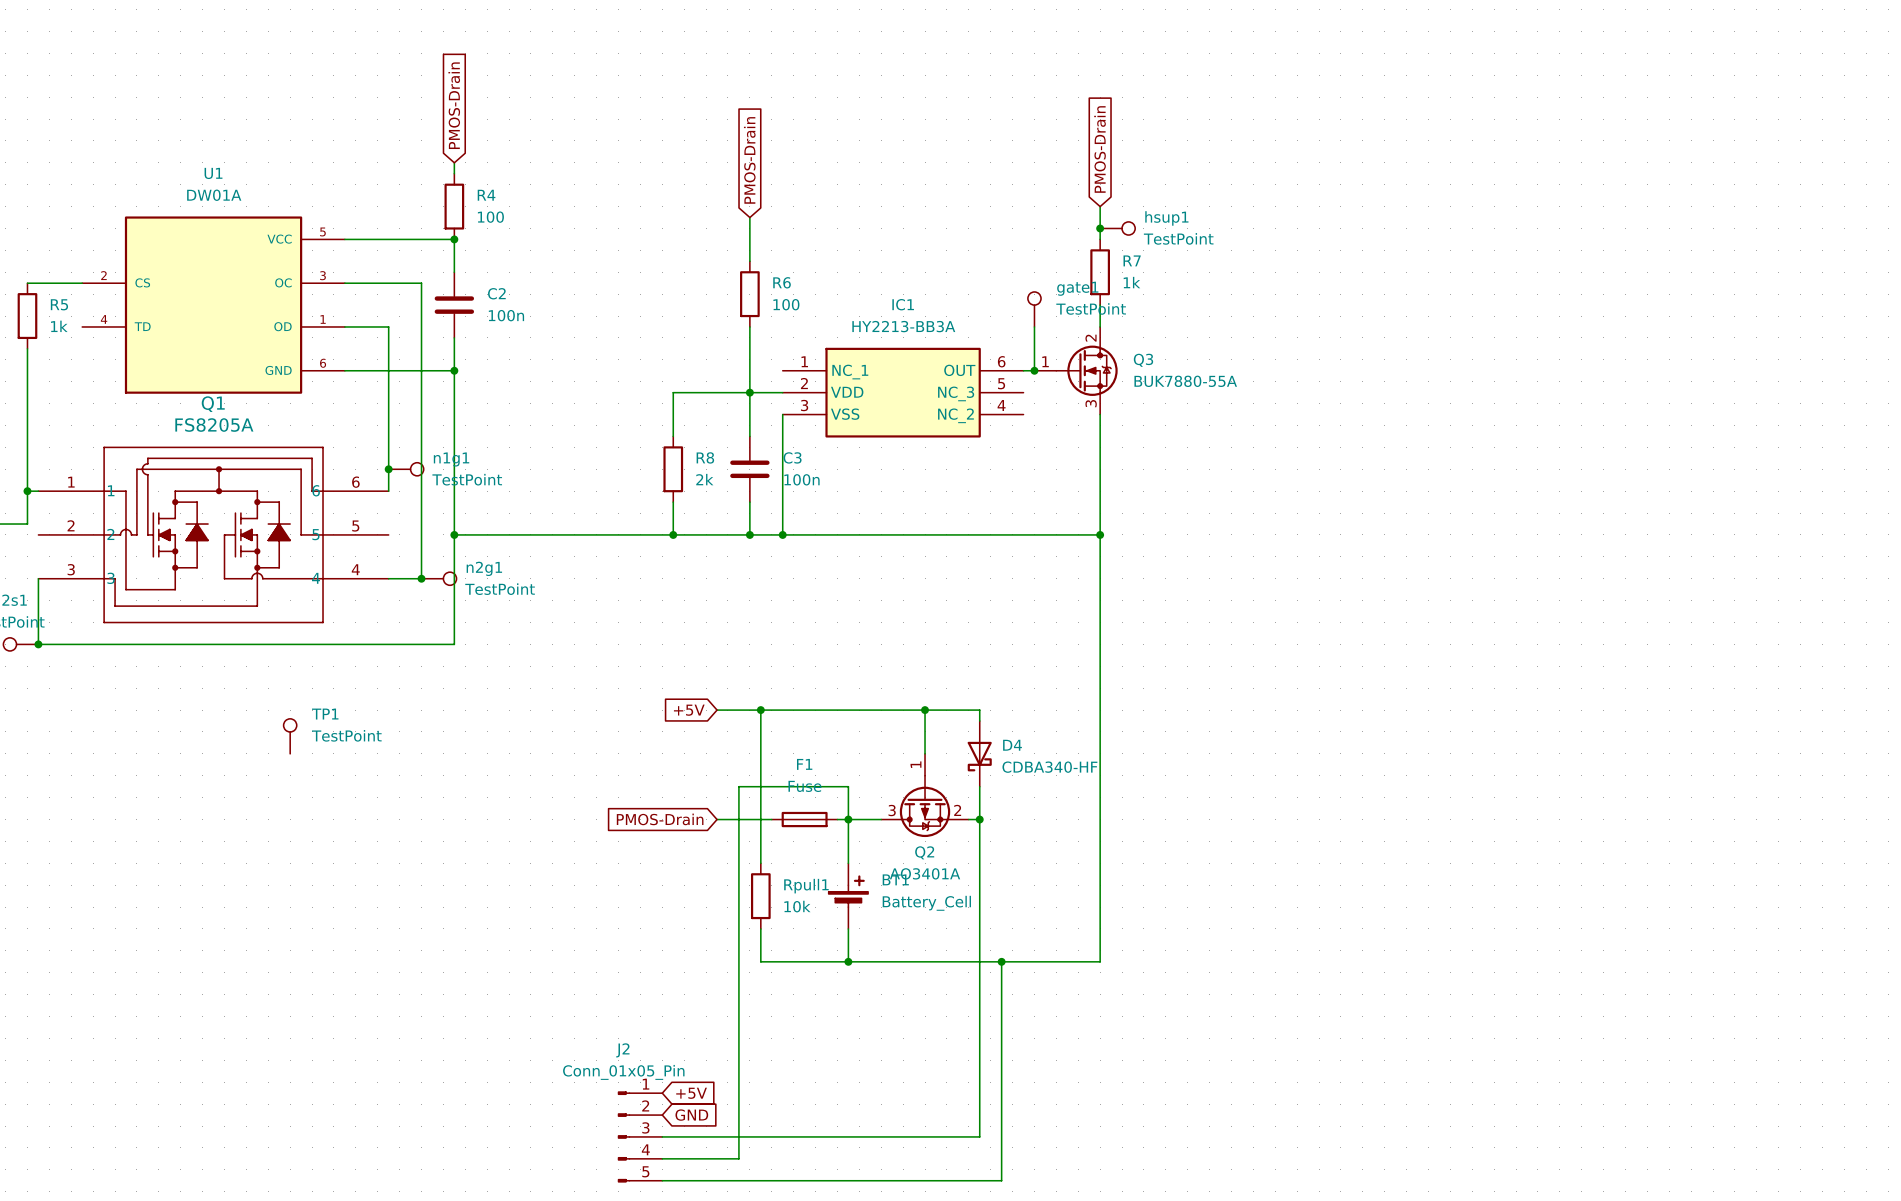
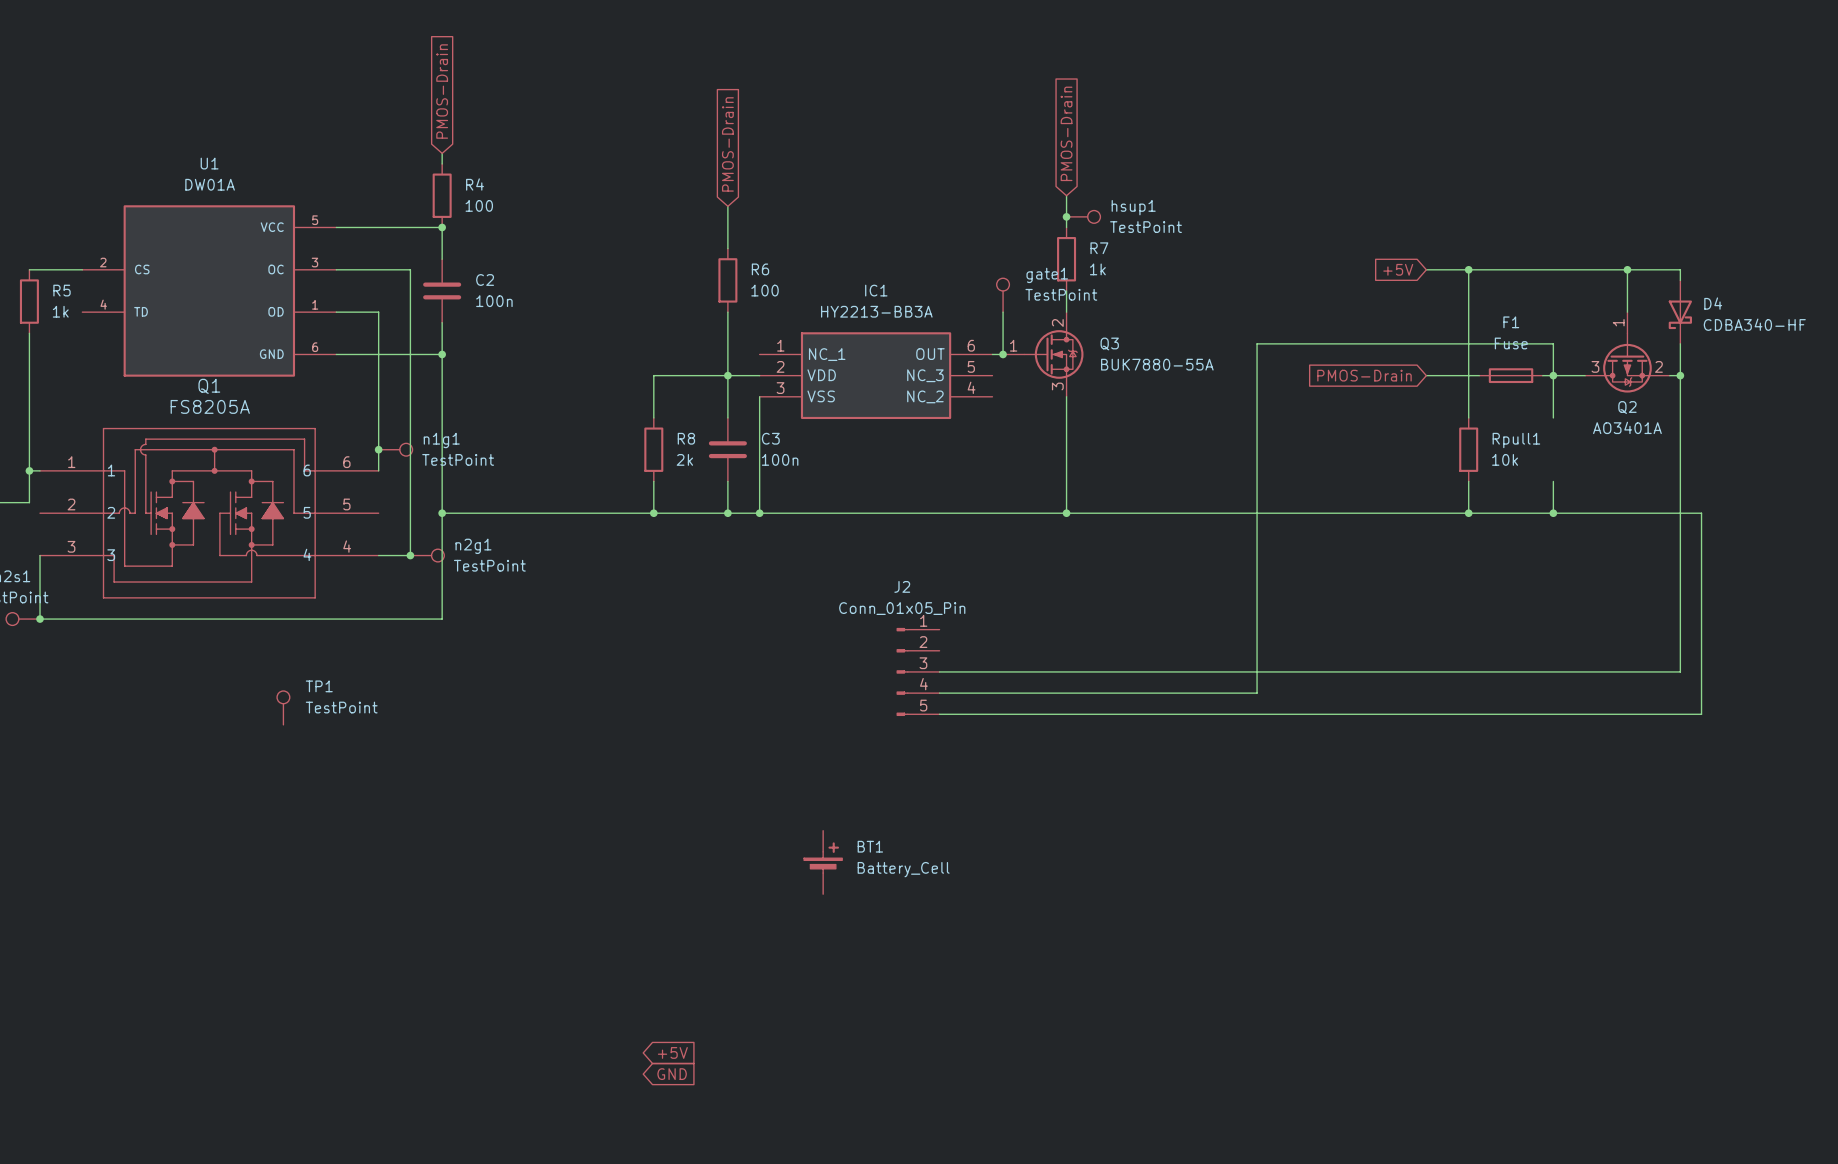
global label: none -> +5V (1398, 269)
wire: none -> (1426, 269) (1680, 269) (1680, 280)
wire: none -> (1468, 269) (1468, 417)
junction: none -> (1468, 269)
wire: none -> (1627, 269) (1627, 312)
junction: none -> (1627, 269)
wire: none -> (1680, 343) (1680, 671) (939, 671)
global label: none -> PMOS-Drain (1364, 375)
wire: none -> (1426, 375) (1479, 375)
wire: none -> (1542, 375) (1585, 375)
junction: none -> (1553, 375)
wire: none -> (1669, 375) (1680, 375)
junction: none -> (1680, 375)
wire: none -> (1553, 417) (1553, 343) (1257, 343) (1257, 693) (939, 693)
wire: none -> (1468, 481) (1468, 513)
wire: none -> (1553, 481) (1553, 513)
wire: (1100, 534) (1100, 961) (760, 961) (760, 928) -> (1066, 513) (1701, 513) (1701, 714) (939, 714)
junction: none -> (1468, 513)
junction: none -> (1553, 513)
global label: +5V (689, 710) -> none
wire: (717, 710) (979, 710) (979, 721) -> none
wire: (760, 710) (760, 863) -> none
junction: (760, 710) -> none
wire: (925, 710) (925, 753) -> none
junction: (925, 710) -> none
D4 position: (979, 753) -> (1680, 312)
wire: (979, 786) (979, 1136) (662, 1136) -> none
Q2 position: (925, 795) -> (1627, 352)
global label: PMOS-Drain (660, 819) -> none
wire: (717, 819) (771, 819) -> none
F1 position: (804, 819) -> (1511, 375)
wire: (837, 819) (881, 819) -> none
junction: (848, 819) -> none
wire: (968, 819) (979, 819) -> none
junction: (979, 819) -> none
wire: (848, 863) (848, 786) (738, 786) (738, 1158) (662, 1158) -> none
Rpull1 position: (760, 896) -> (1468, 449)
wire: (848, 928) (848, 961) -> none
junction: (848, 961) -> none
wire: (1001, 961) (1001, 1180) (662, 1180) -> none
junction: (1001, 961) -> none
J2 position: (640, 1136) -> (918, 671)

